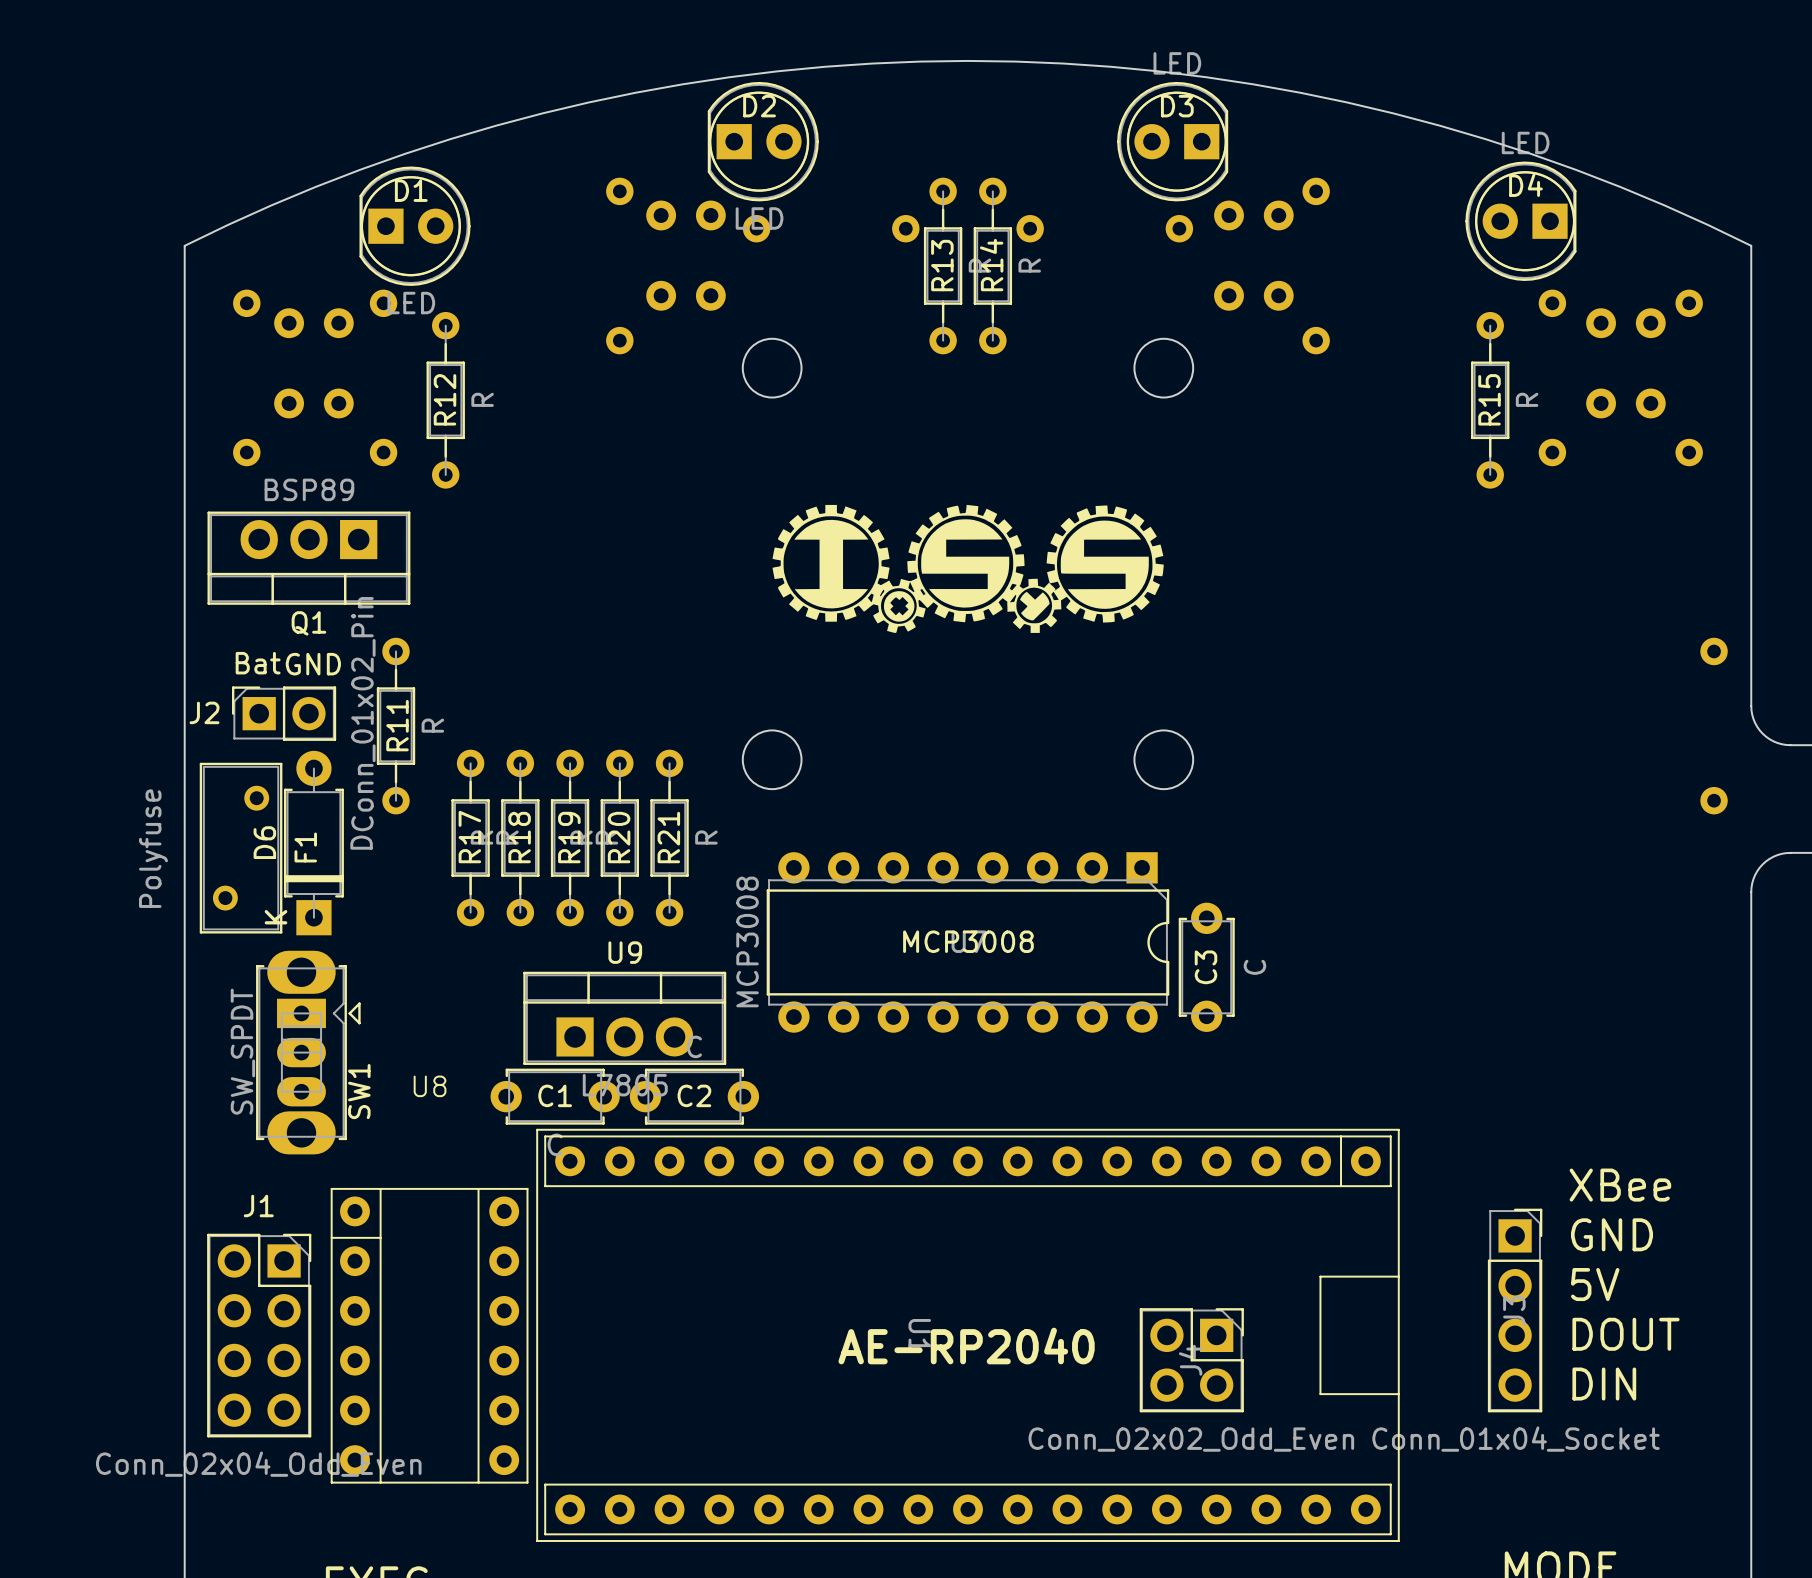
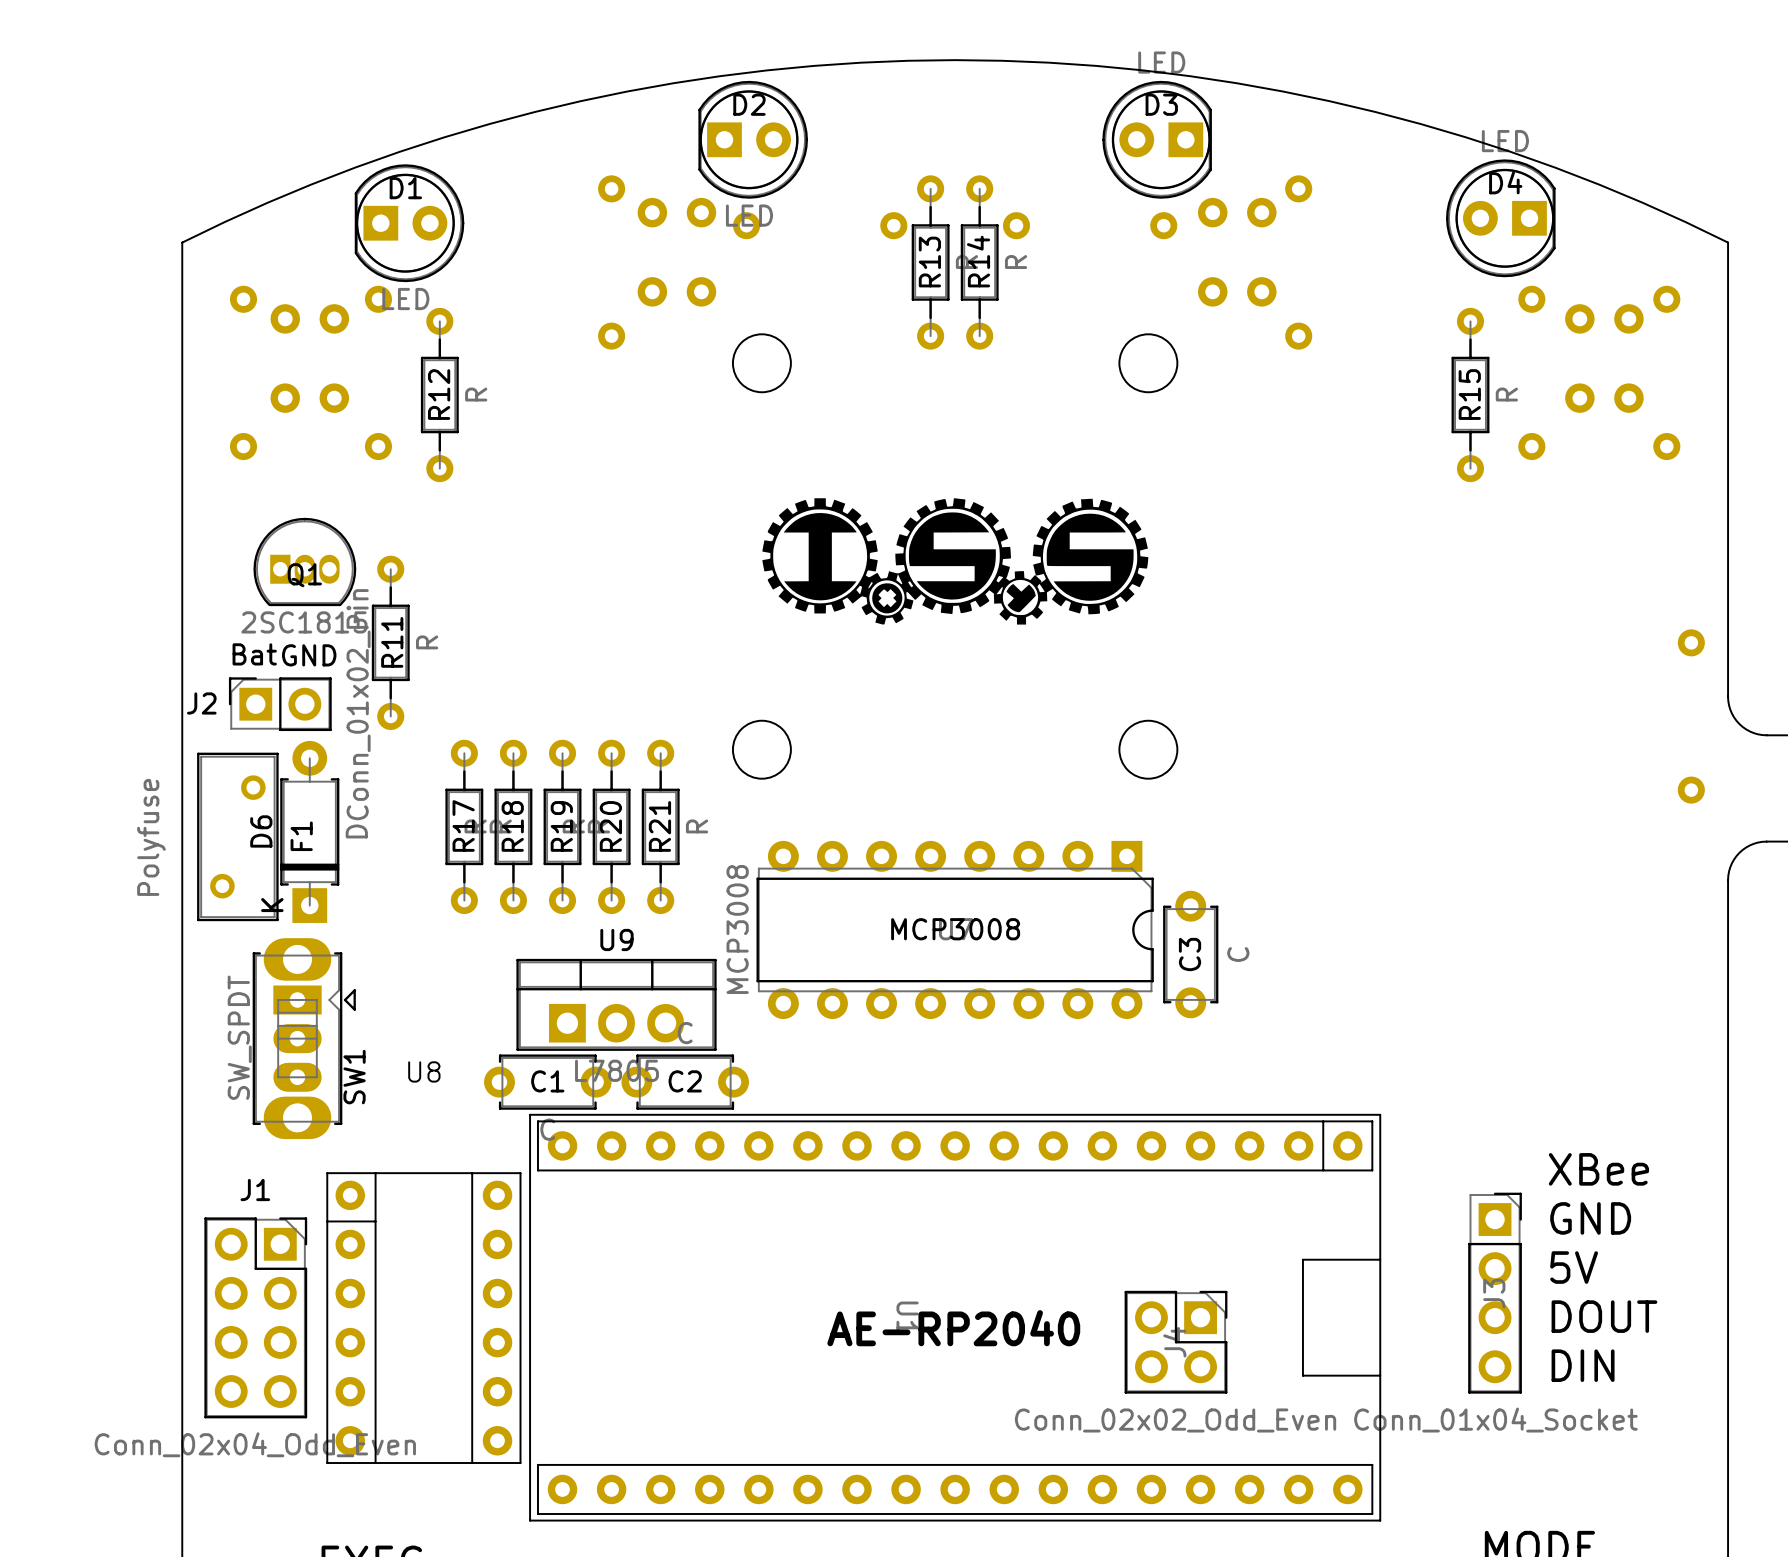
Q1 value: BSP89 (309, 489) -> 2SC1815 (304, 622)
Q1 footprint: [207, 511, 411, 605] -> [253, 517, 357, 607]
Q1 name position: Q1 (308, 623) -> Q1 (304, 575)
R11 position: (395, 726) -> (390, 642)

